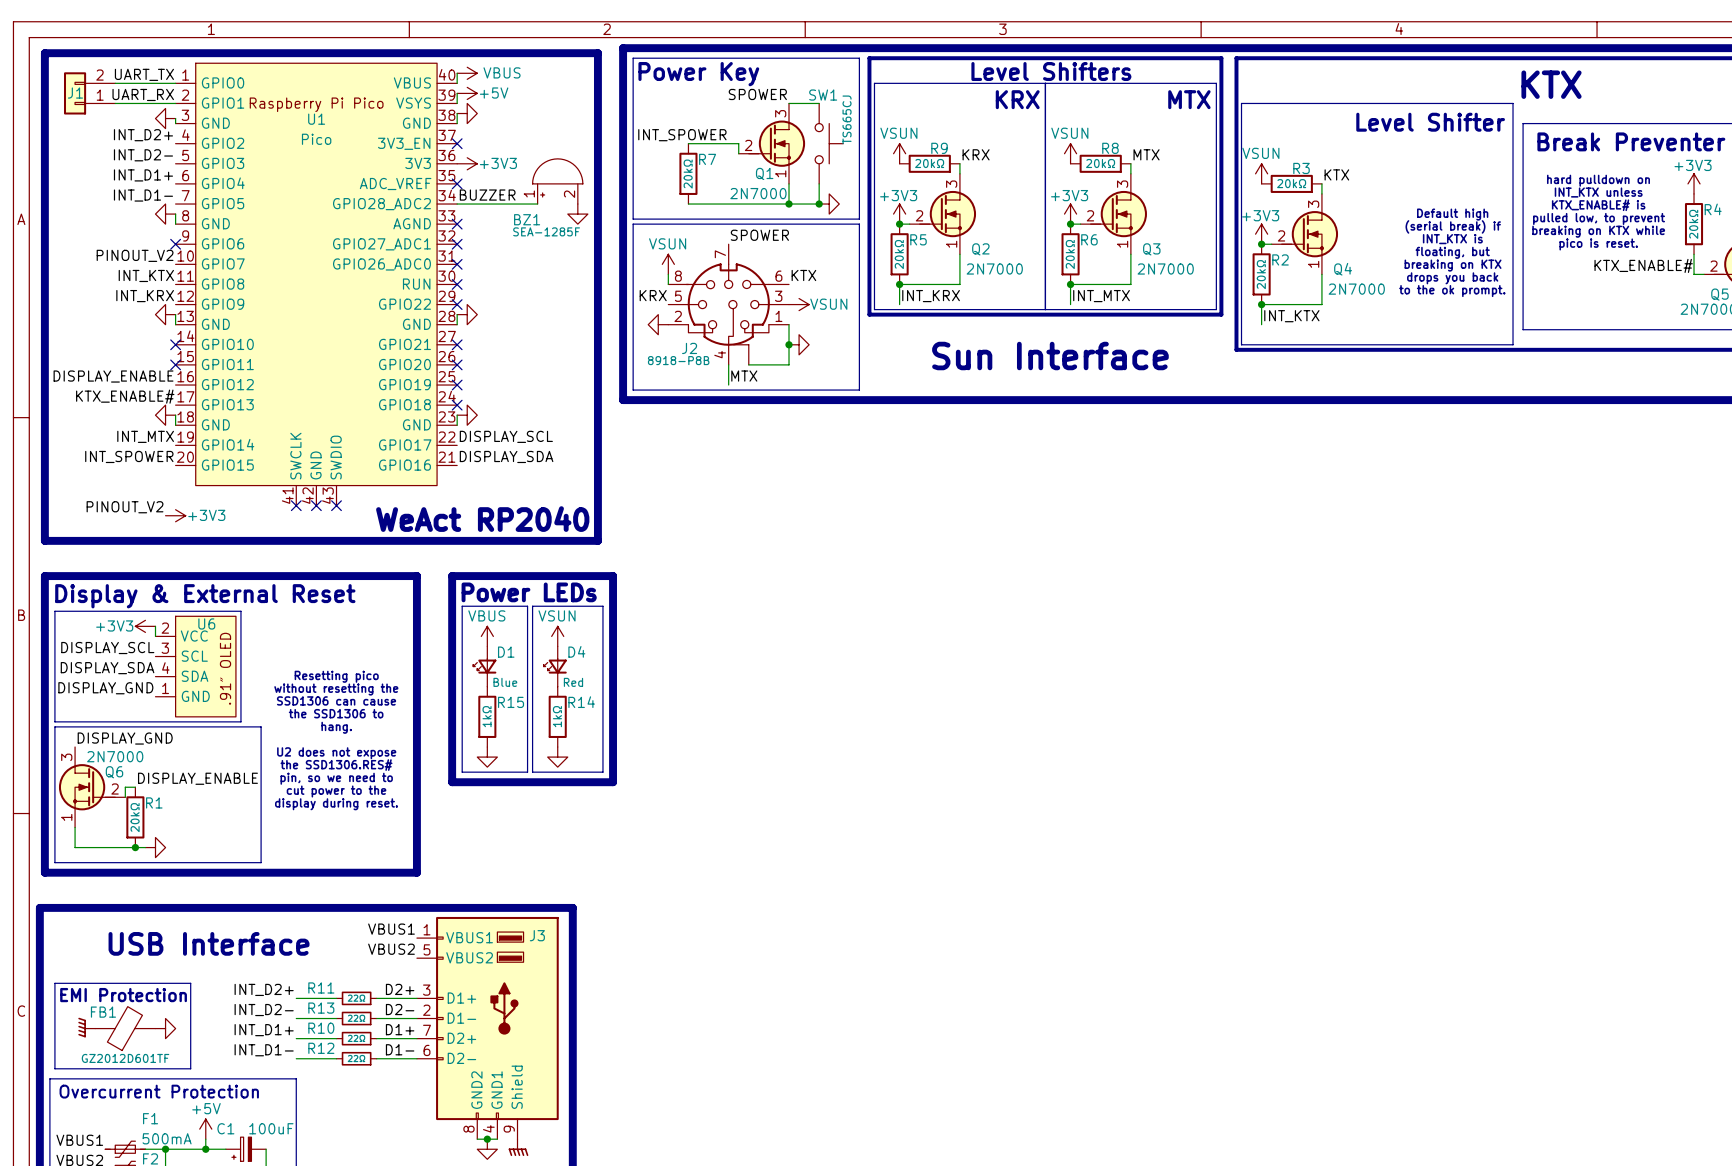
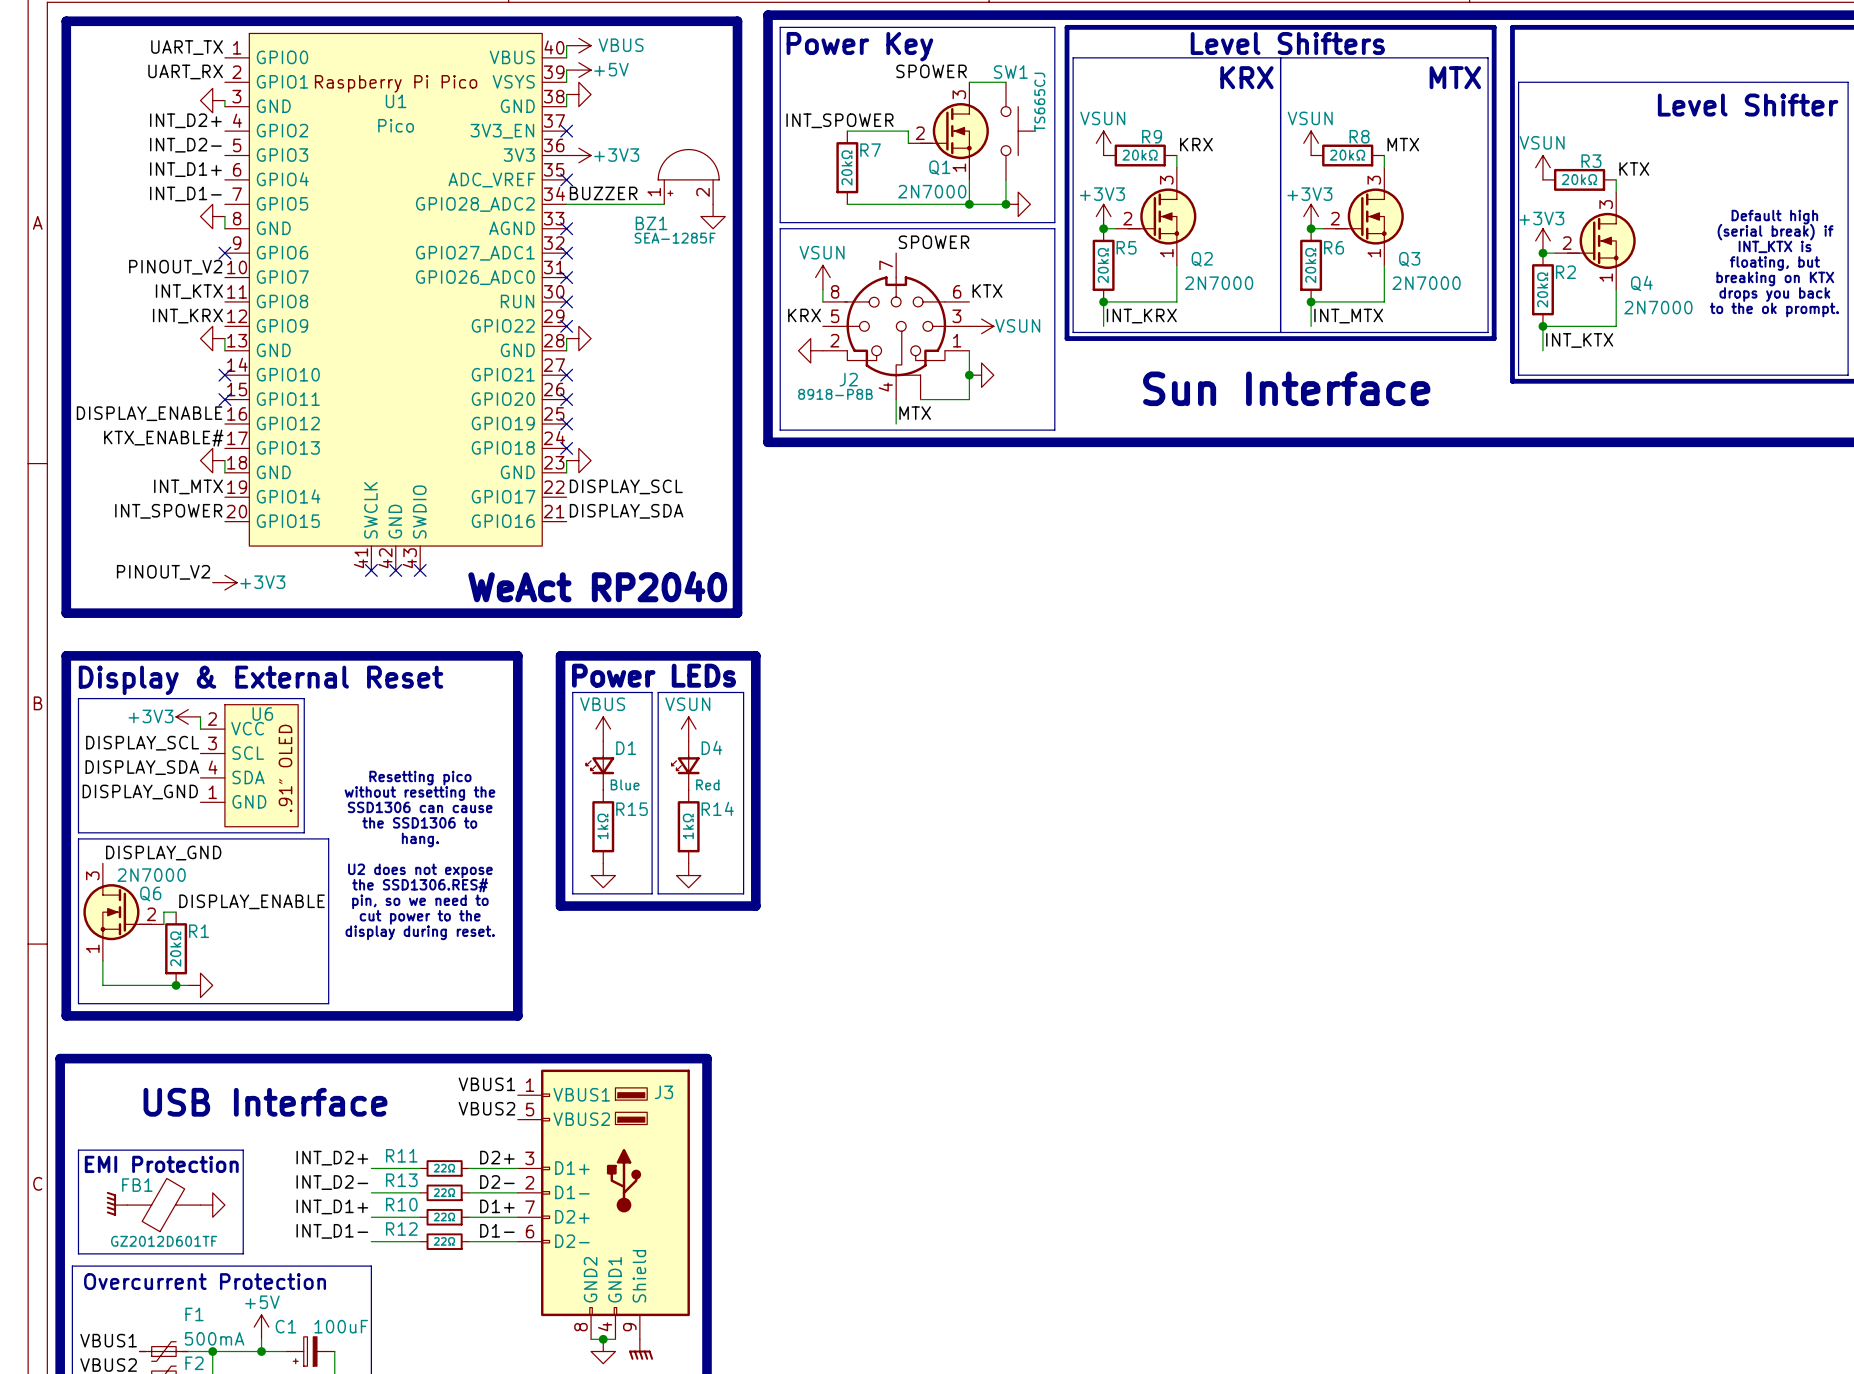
wire: (115, 83) (175, 83) -> none
J1: (89, 93) -> none
wire: (115, 103) (175, 103) -> none

